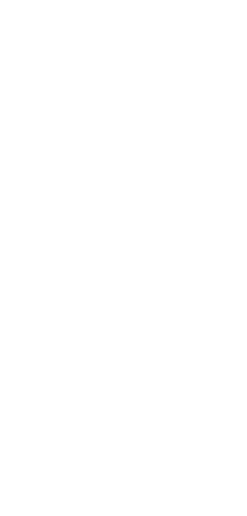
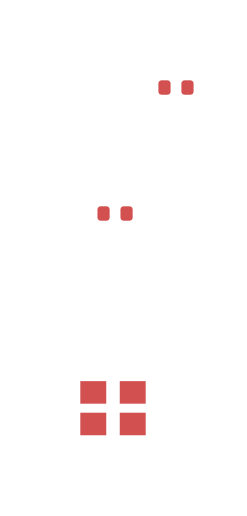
part: none -> (175, 87)
part: none -> (115, 213)
part: none -> (113, 408)

